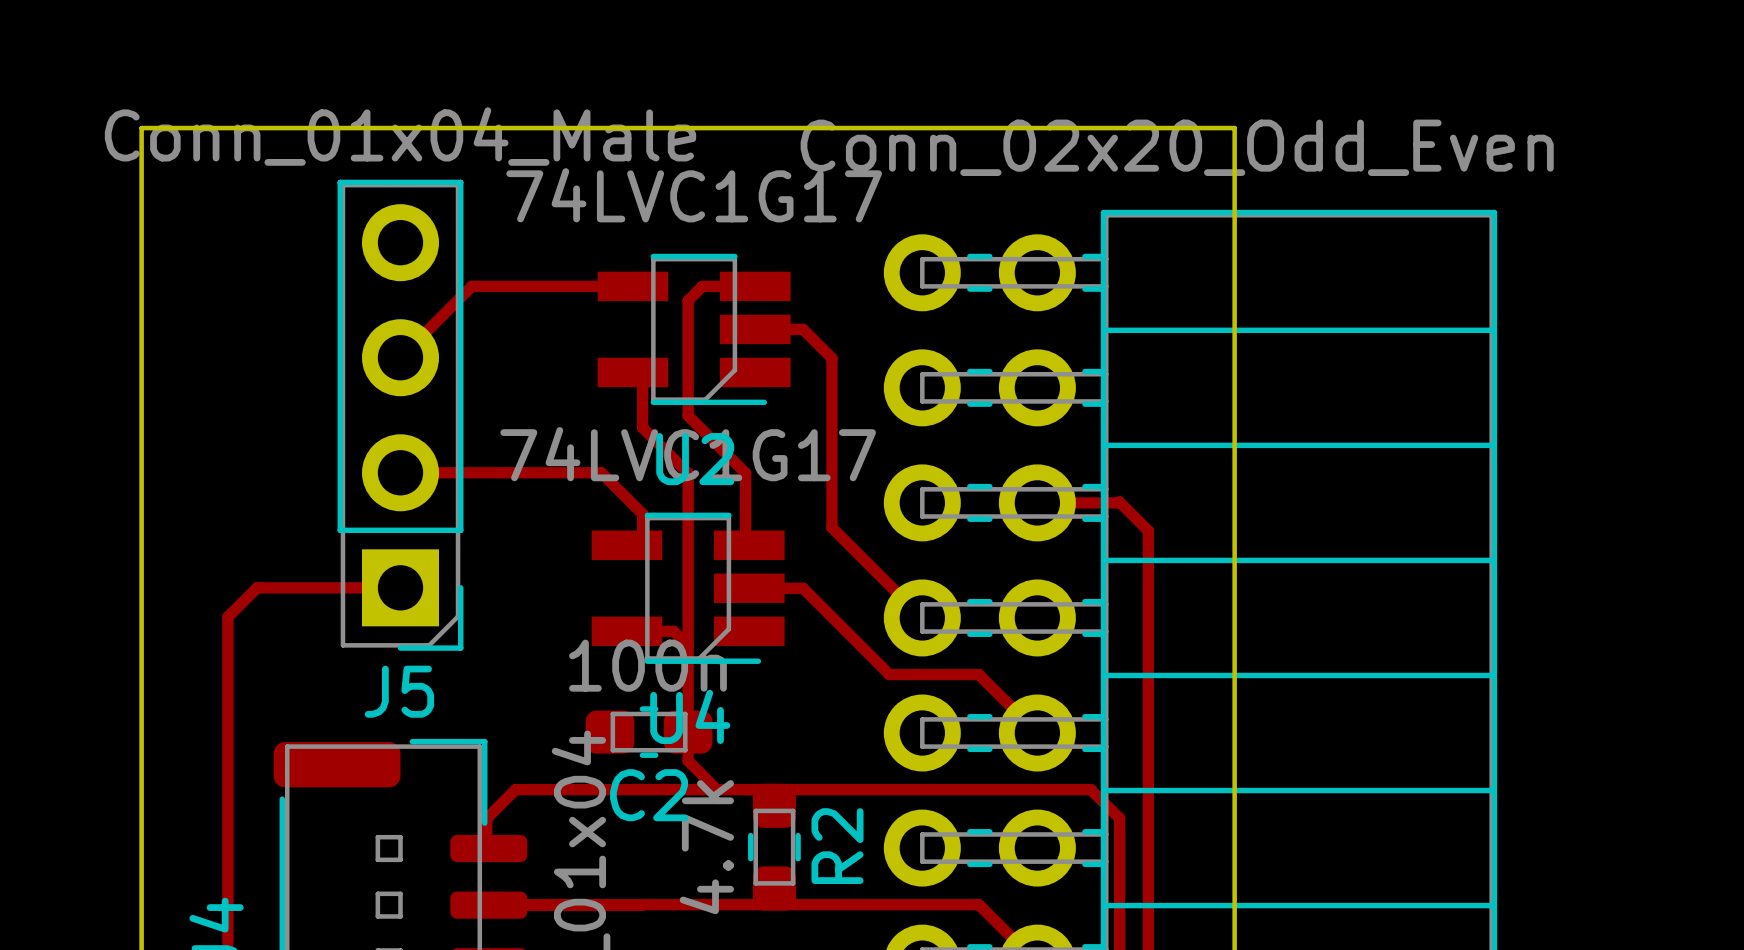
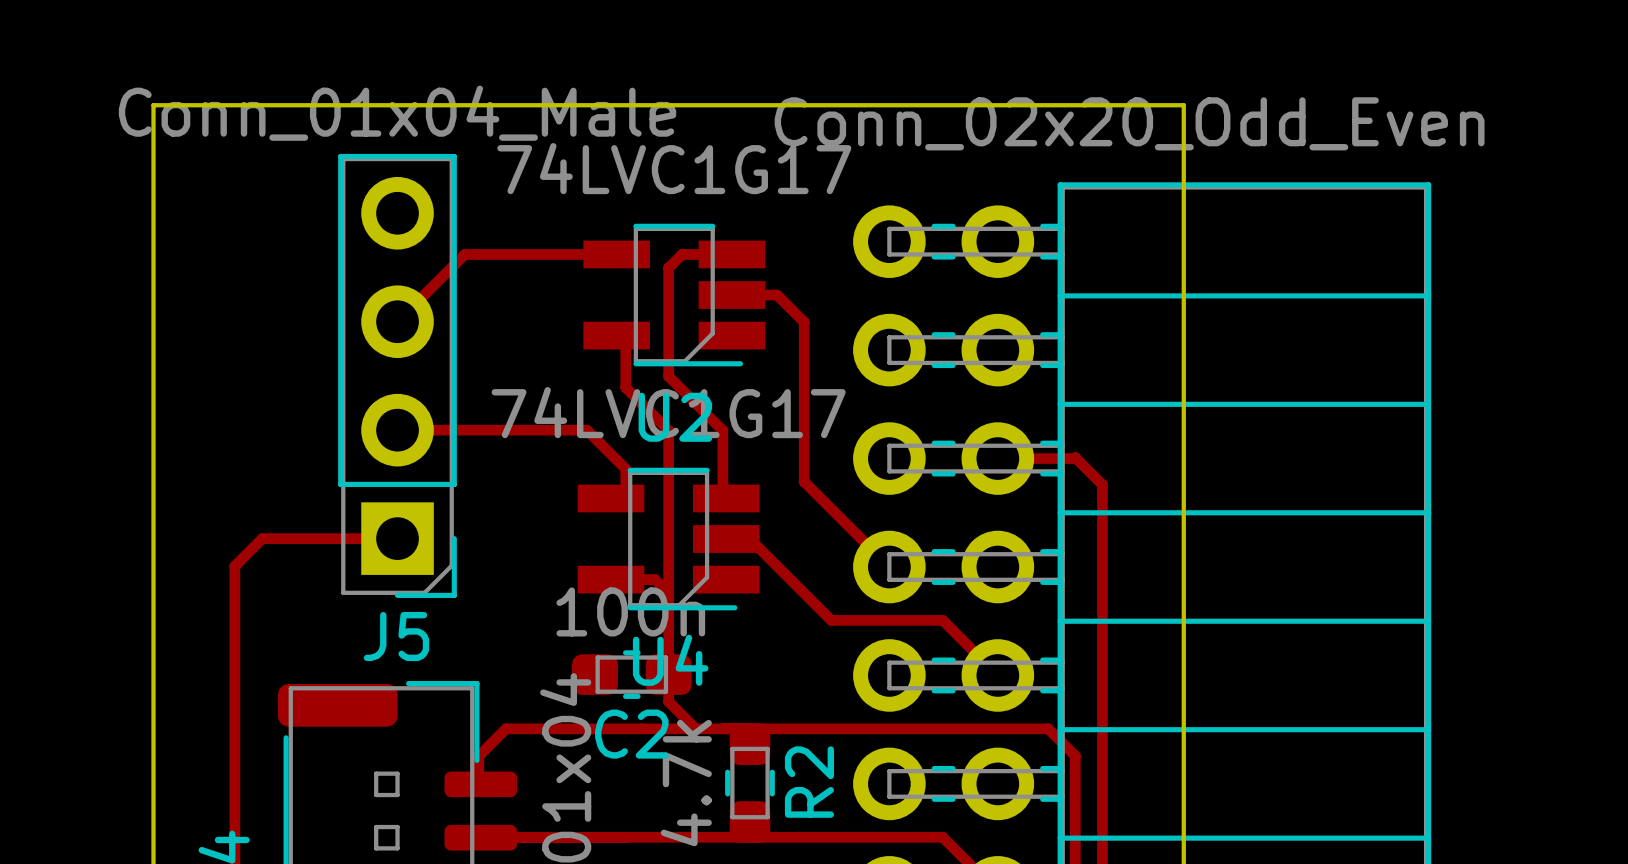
top track: (774, 588) (803, 588) (889, 674) -> (749, 539) (831, 620) (858, 620)

